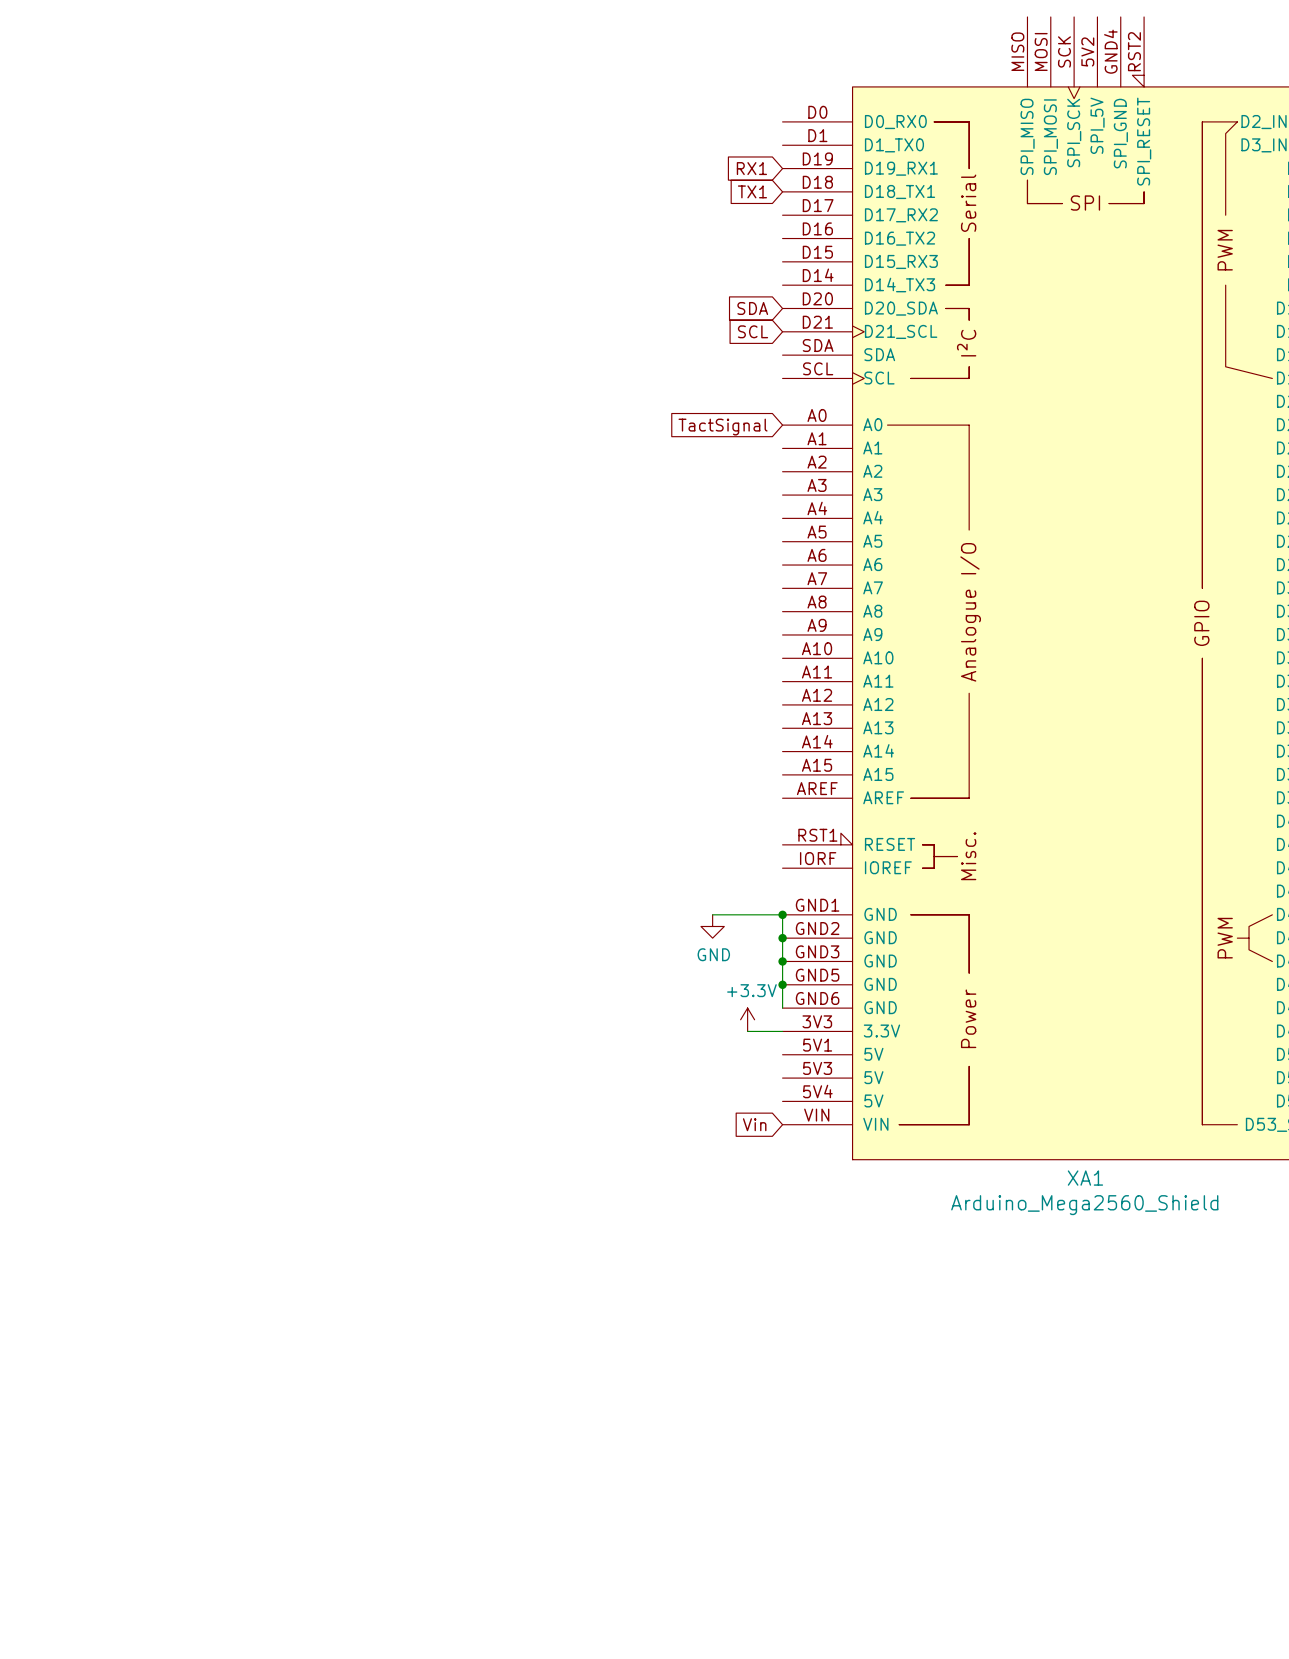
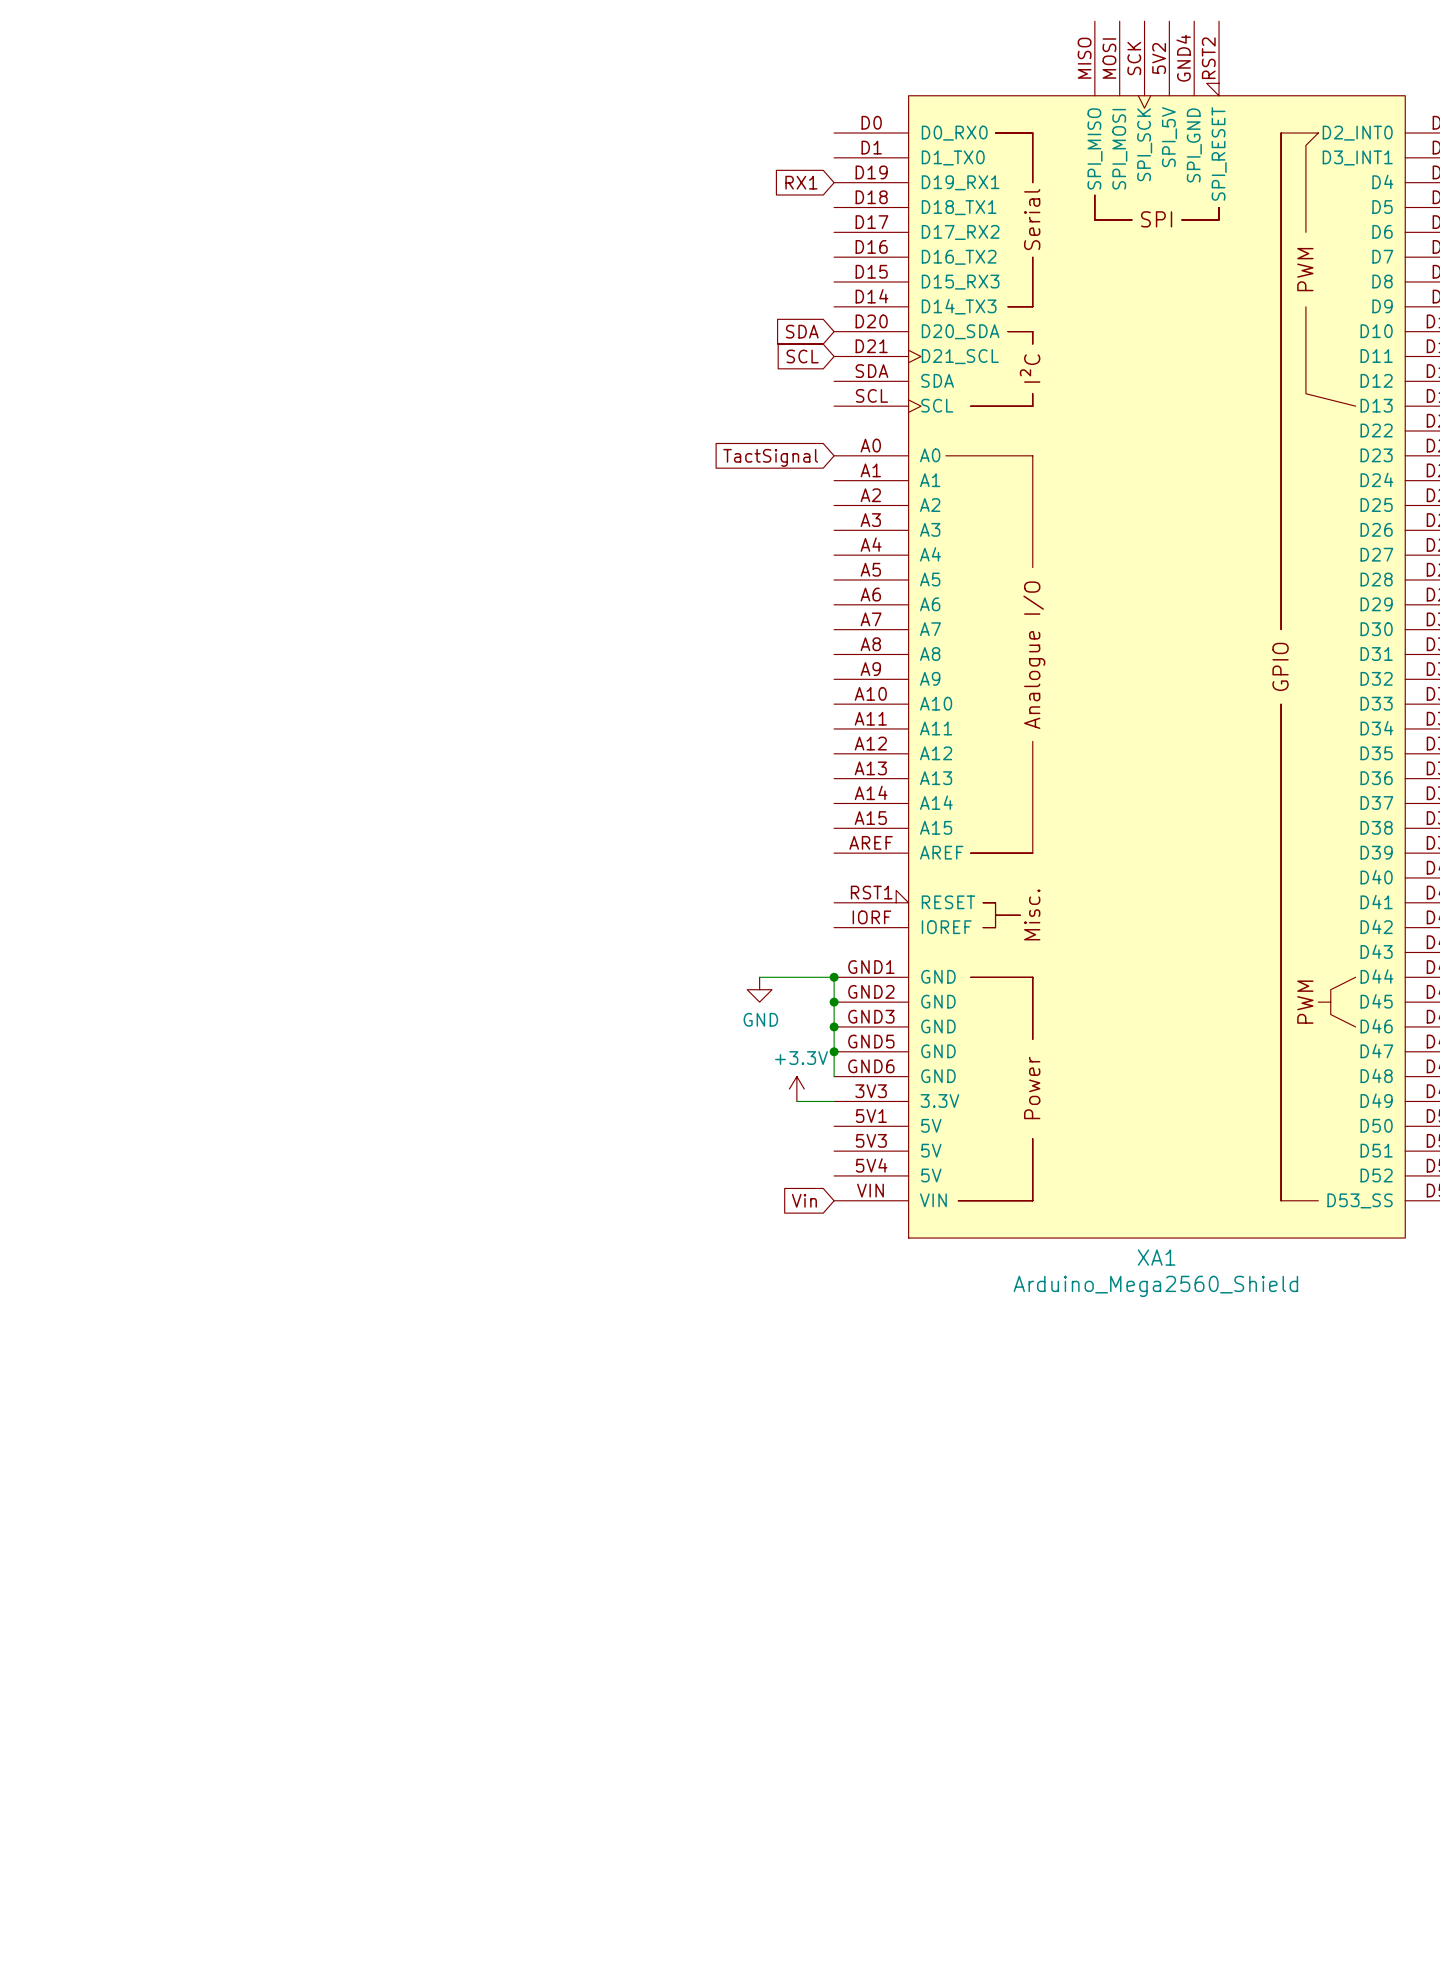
global label: TX1 (752, 191) -> none

